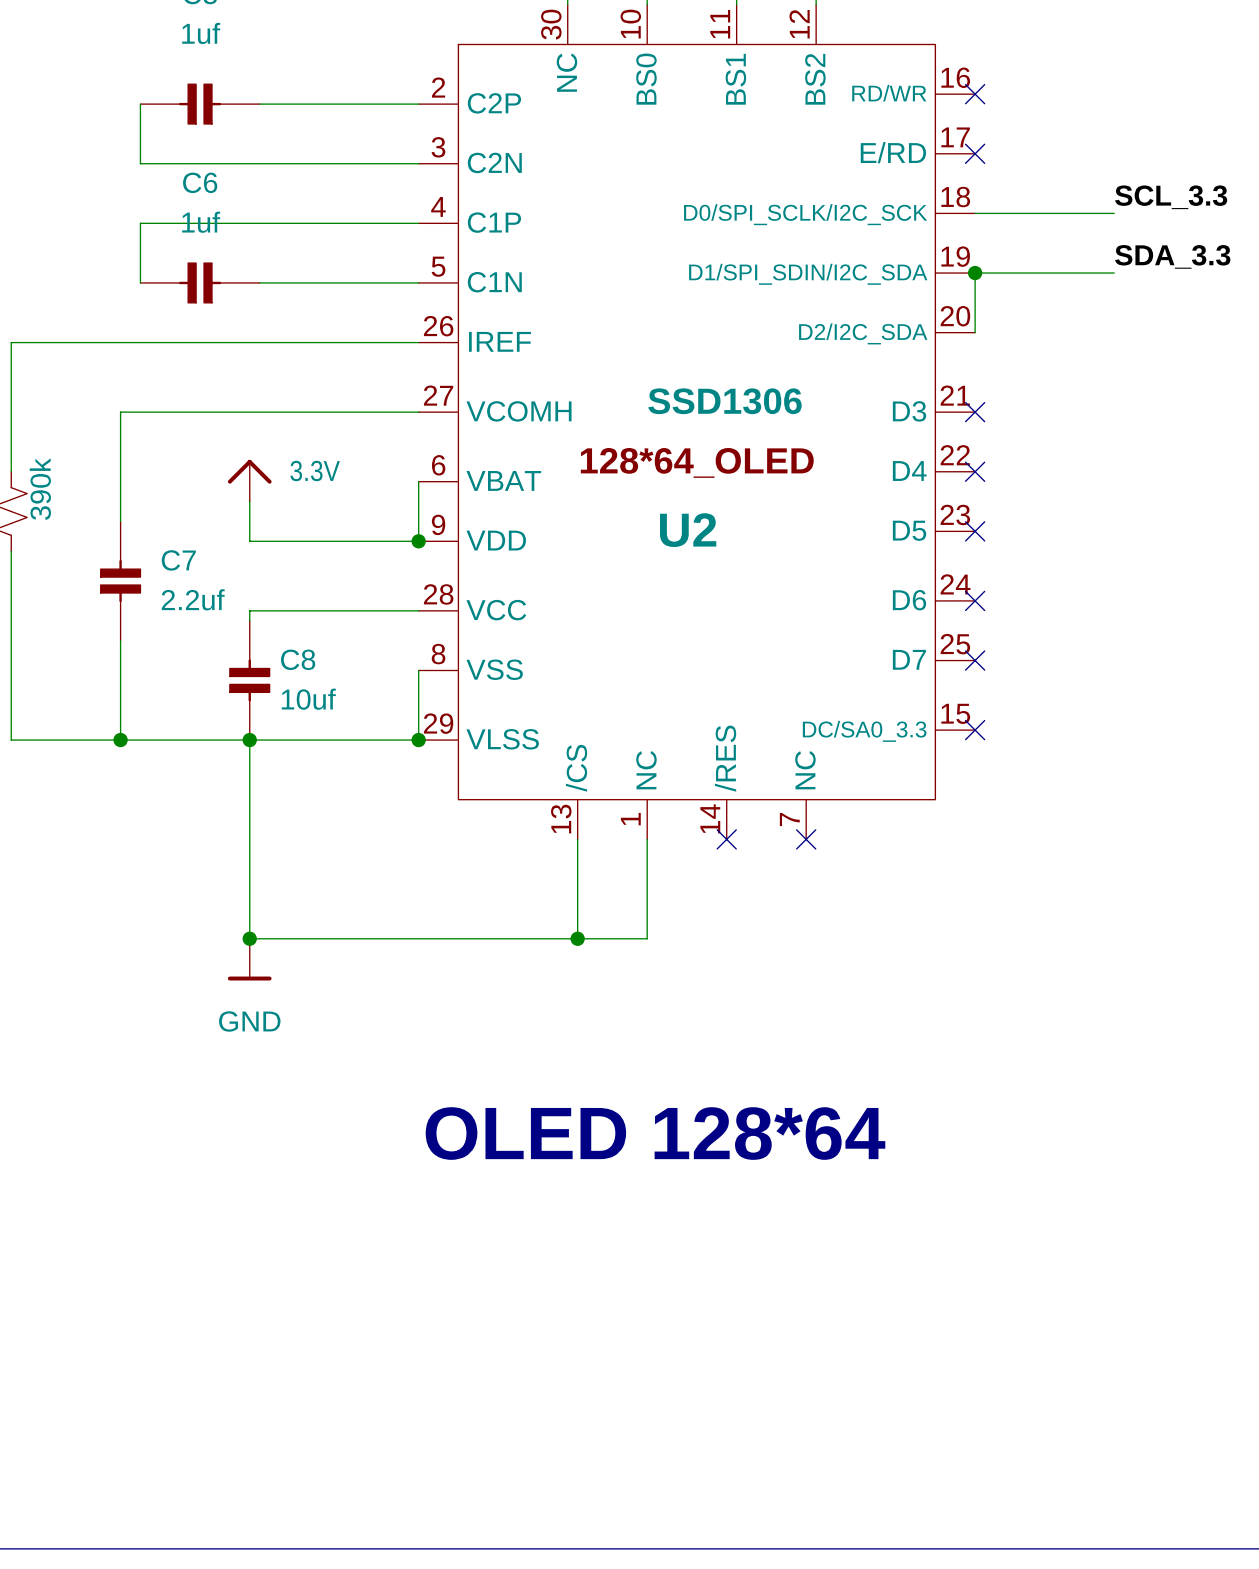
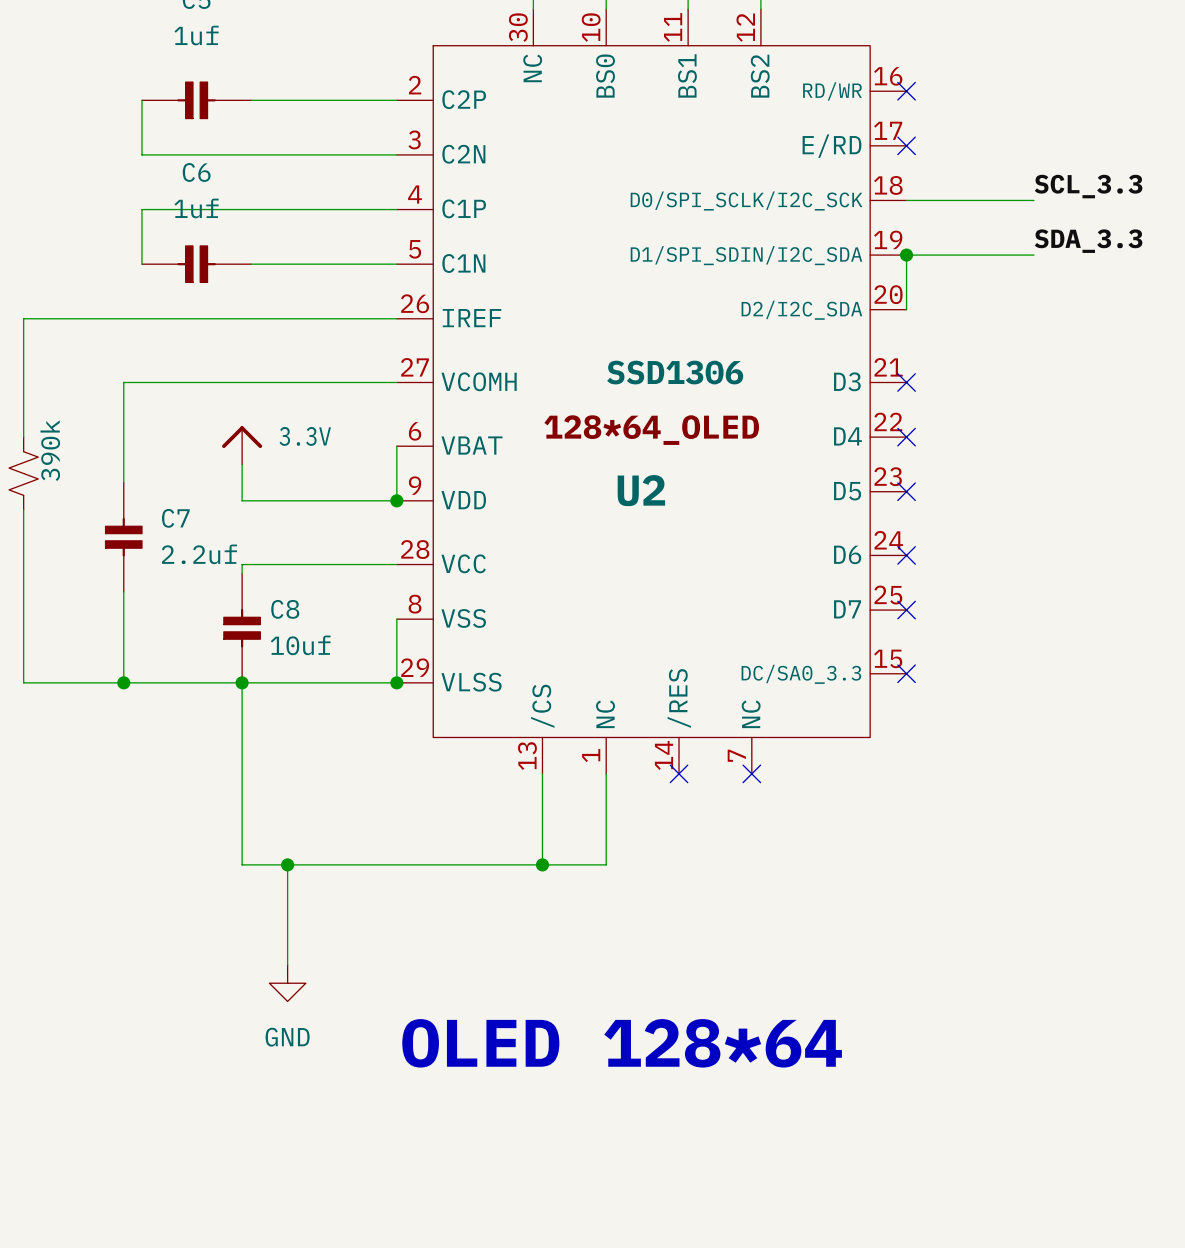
junction position: (249, 938) -> (287, 864)
wire: none -> (287, 864) (287, 965)
power symbol: GND (249, 959) -> none
power symbol: none -> GND (287, 983)

